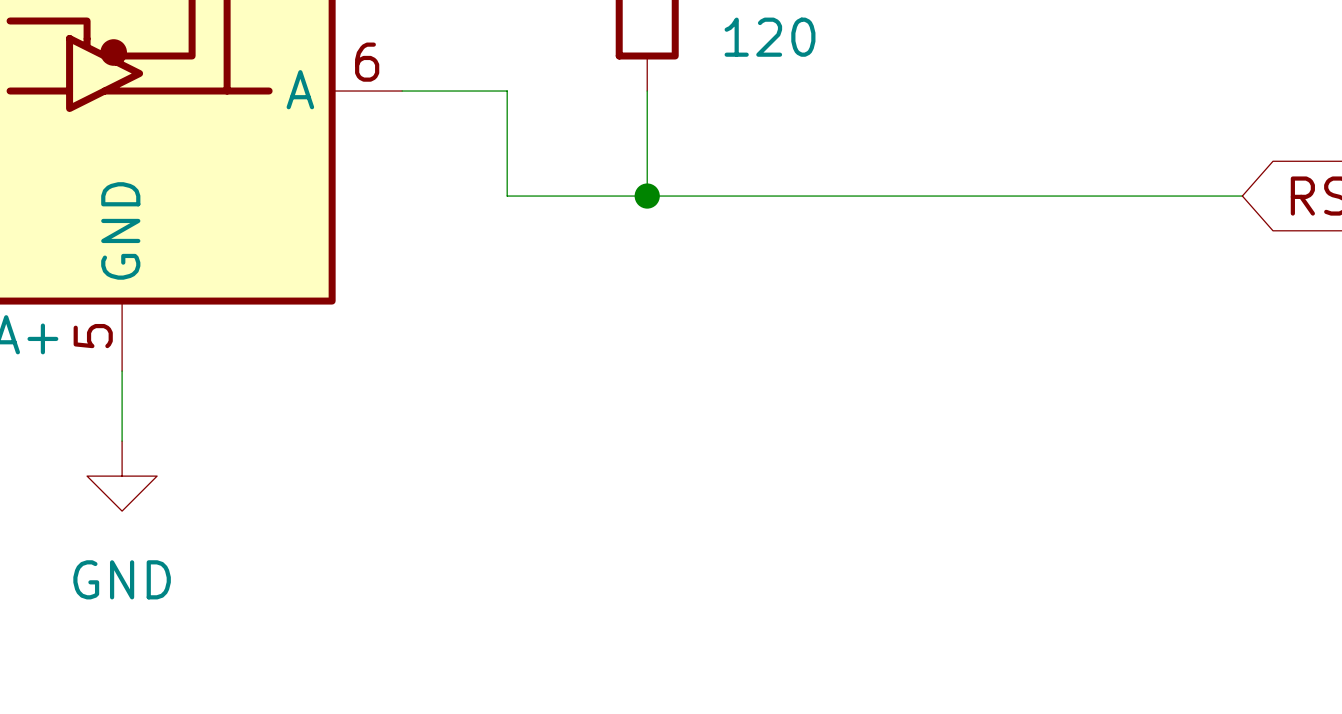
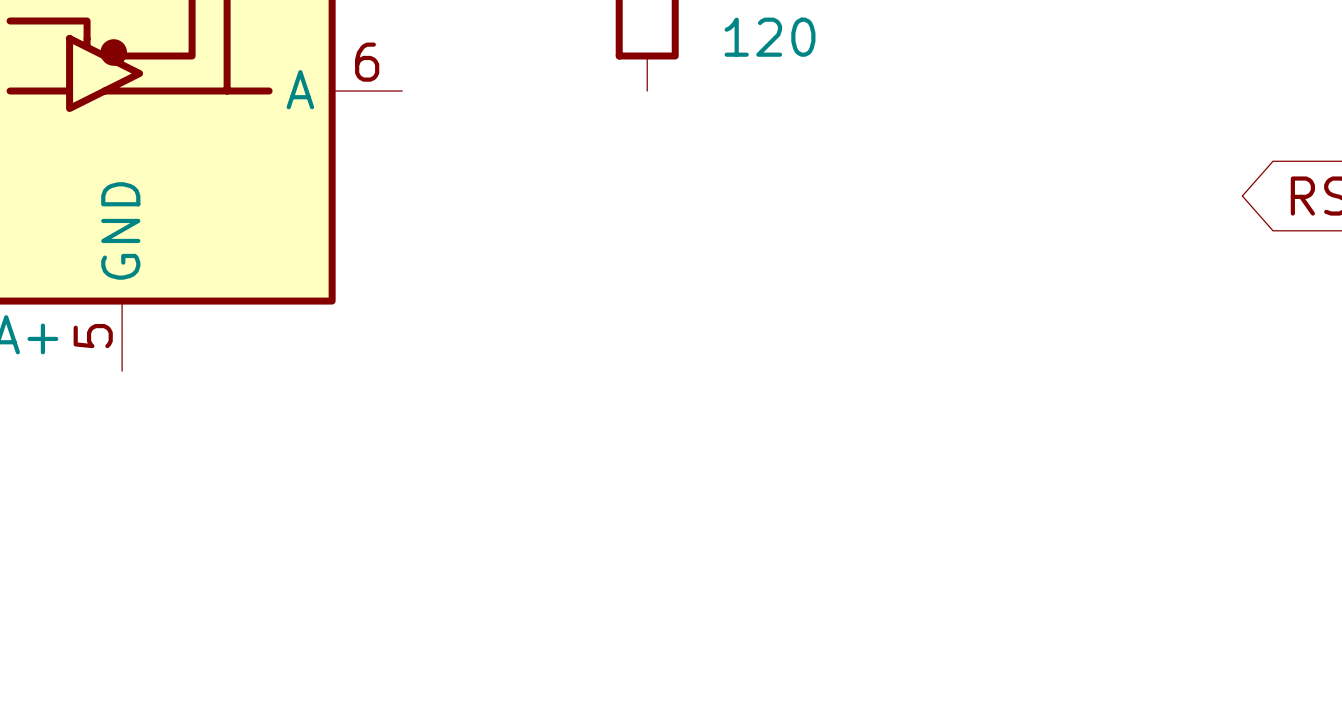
wire: (402, 91) (507, 91) (507, 196) (1242, 196) -> none
wire: (647, 91) (647, 196) -> none
junction: (647, 196) -> none
wire: (122, 371) (122, 441) -> none
power symbol: GND (122, 476) -> none

